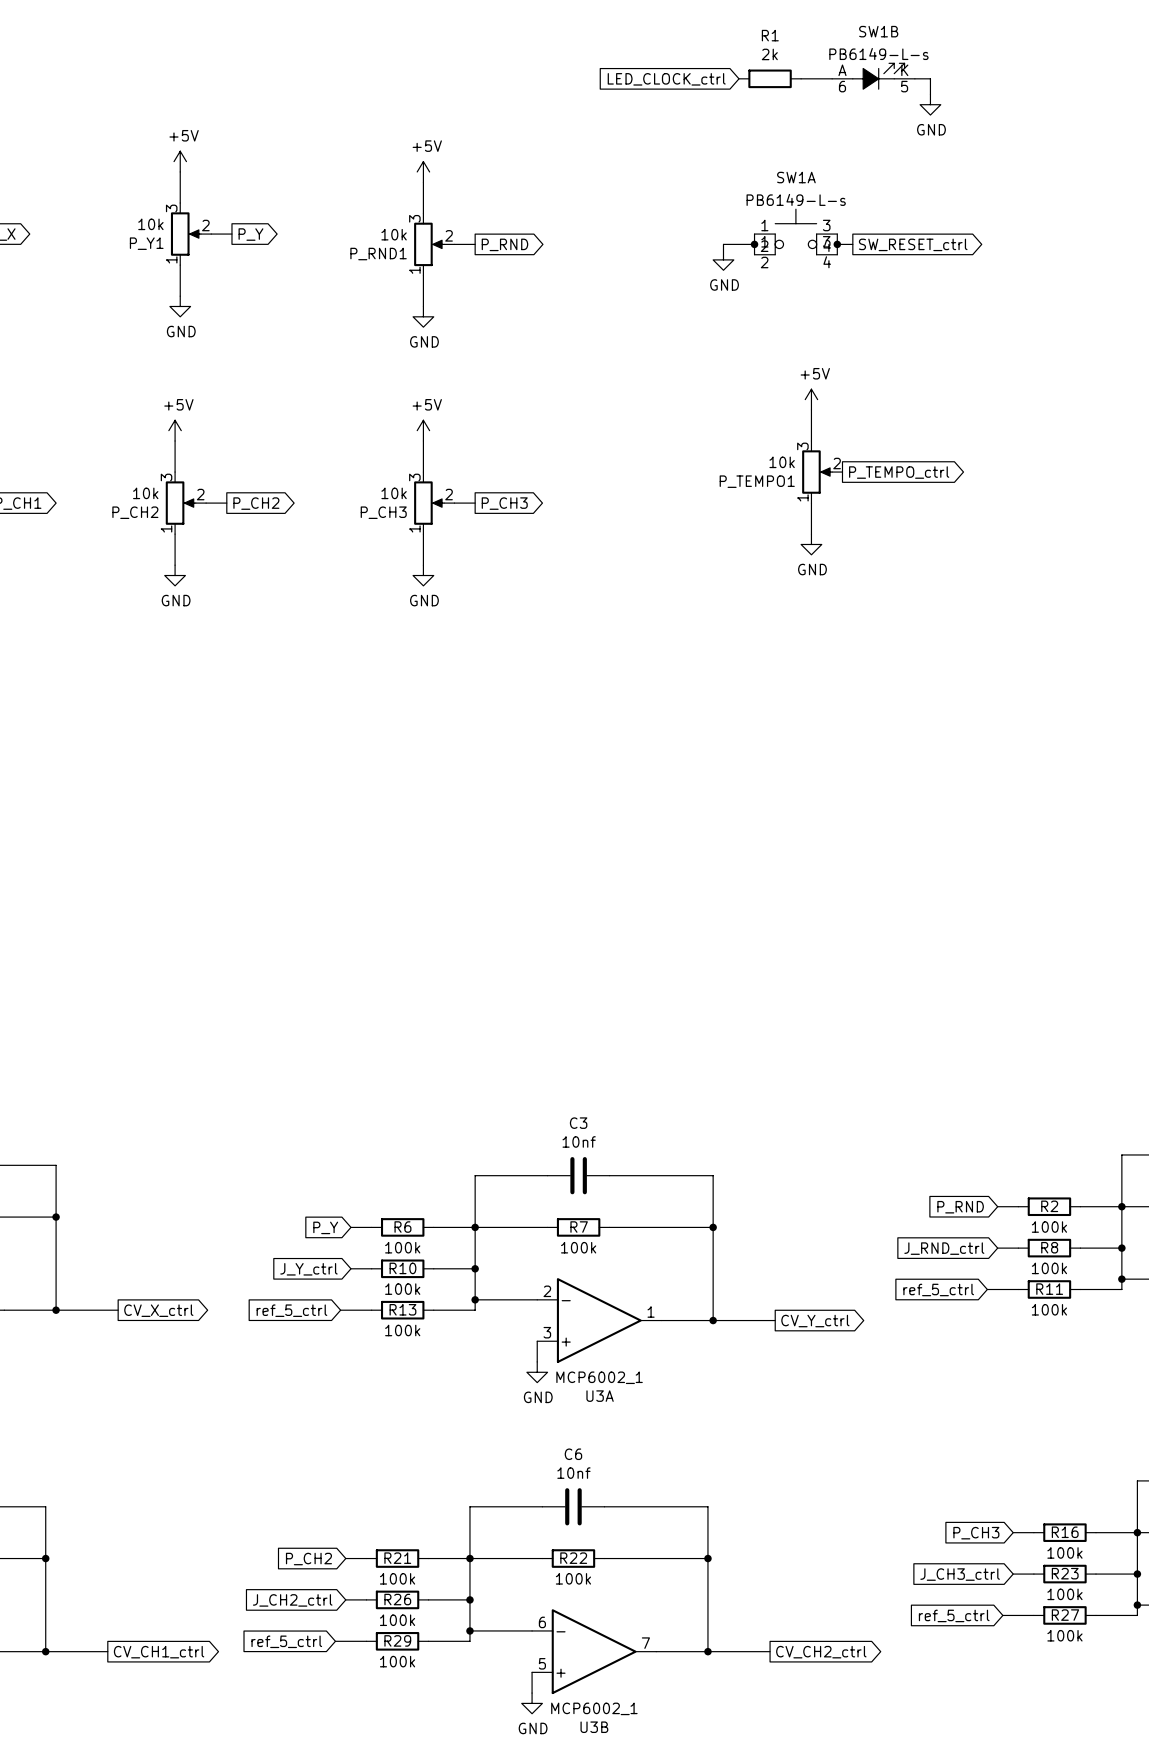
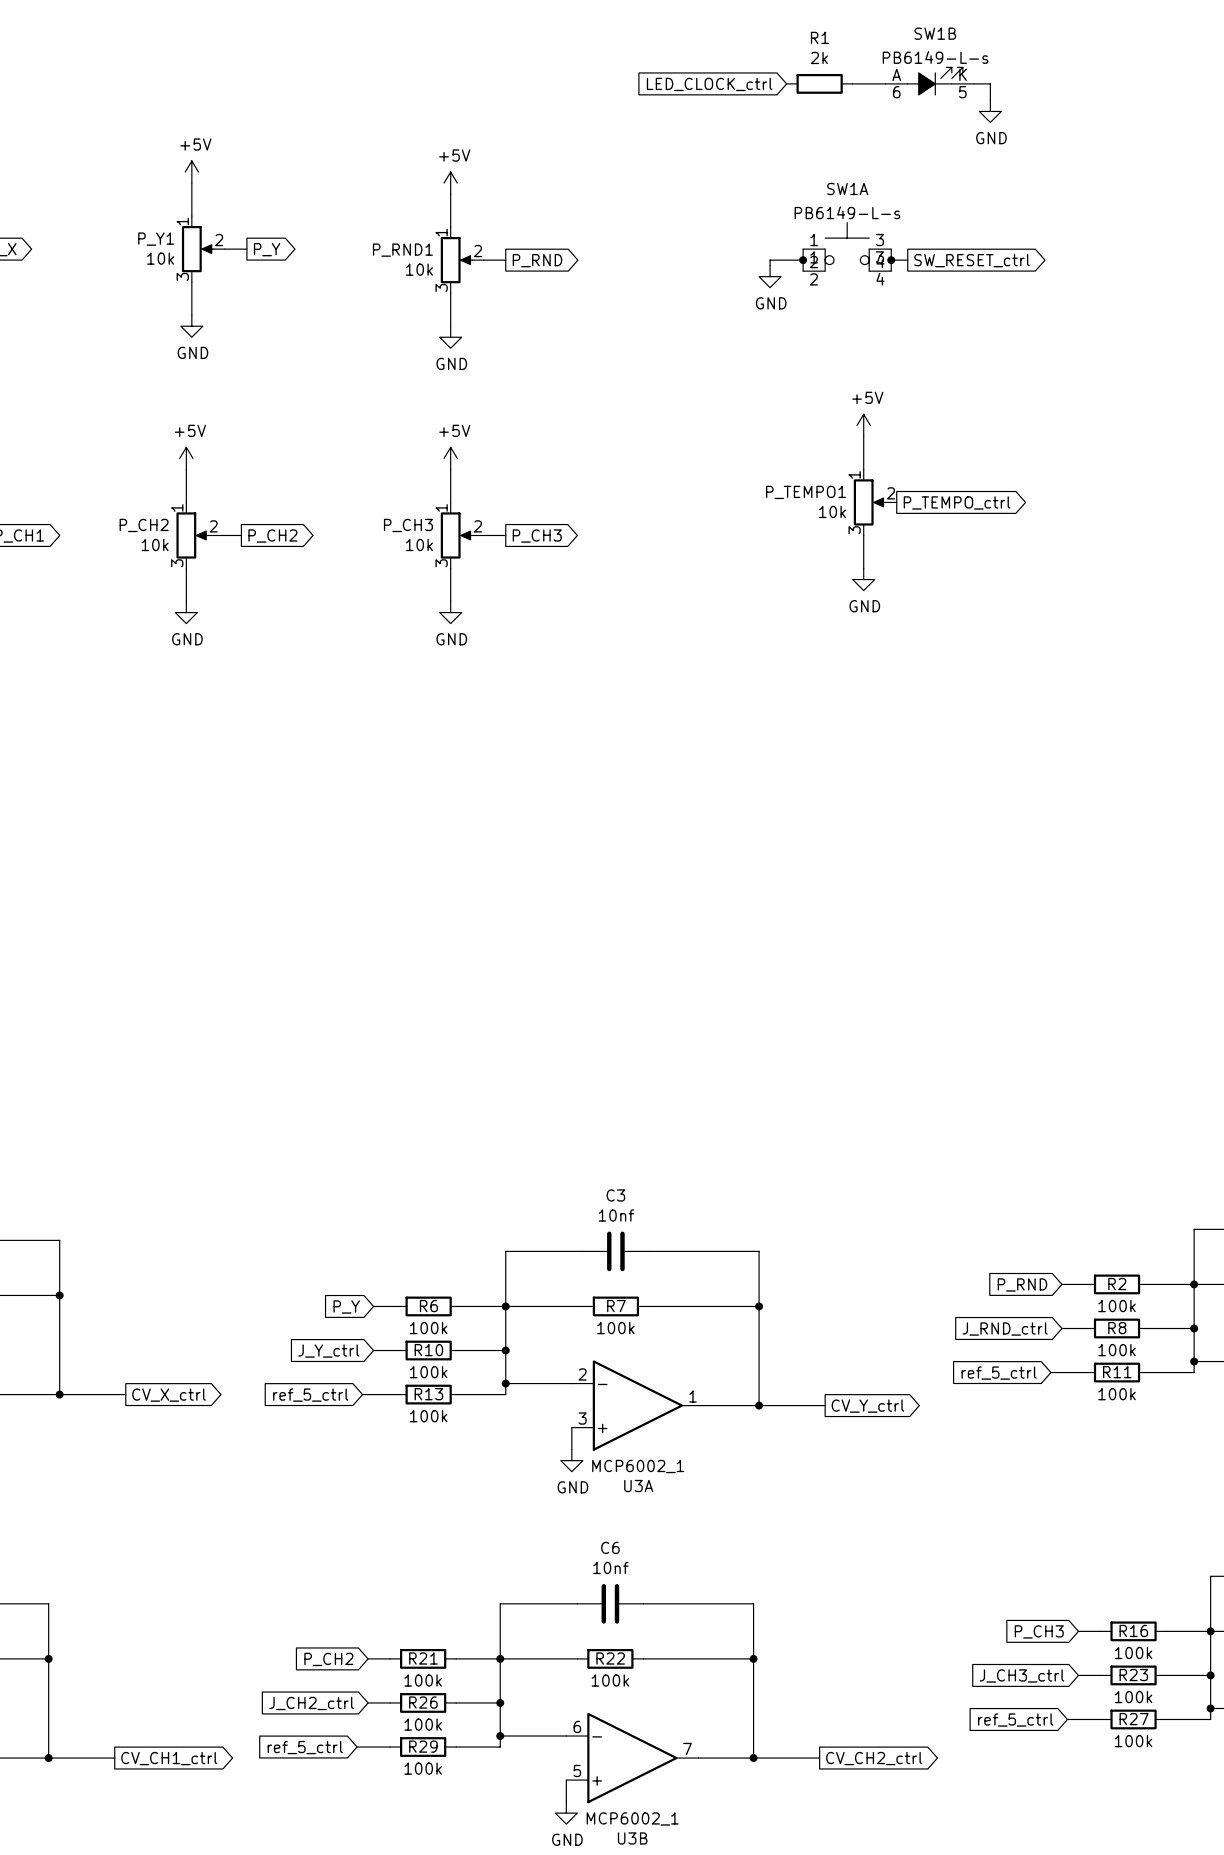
P_Y1 flip: as is (185, 234) -> up-down (197, 249)
P_RND1 flip: as is (429, 244) -> up-down (456, 260)
P_TEMPO1 flip: as is (817, 472) -> up-down (869, 502)
P_CH2 flip: as is (180, 503) -> up-down (192, 535)
P_CH3 flip: as is (429, 503) -> up-down (456, 535)

